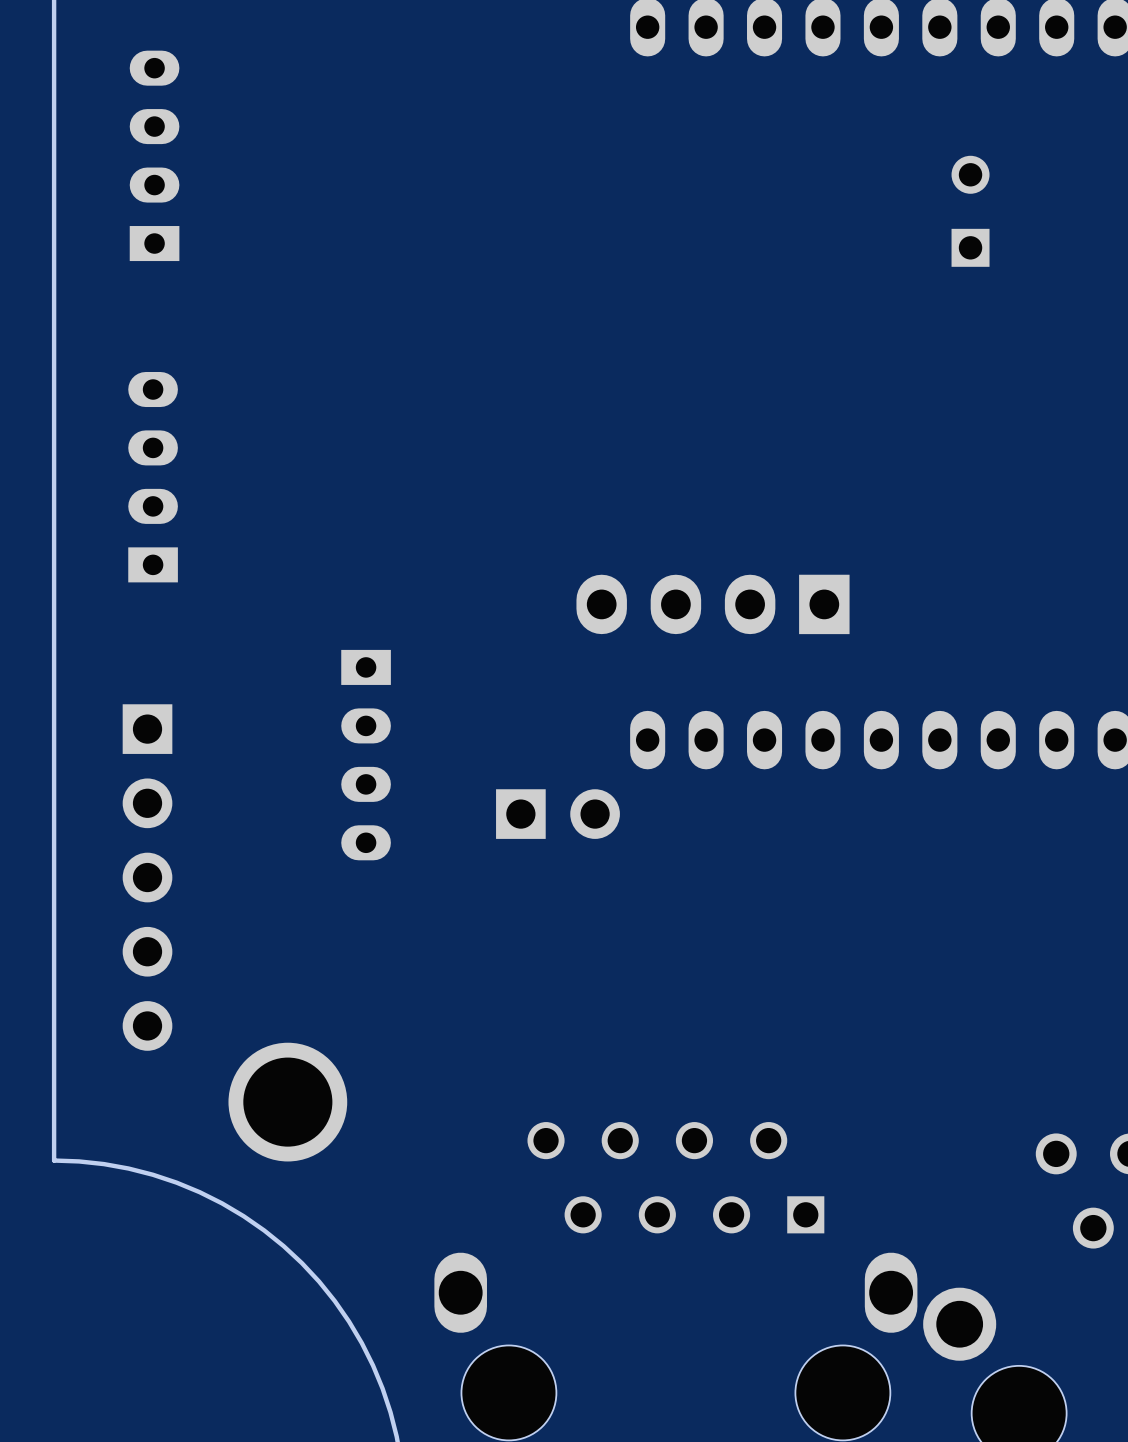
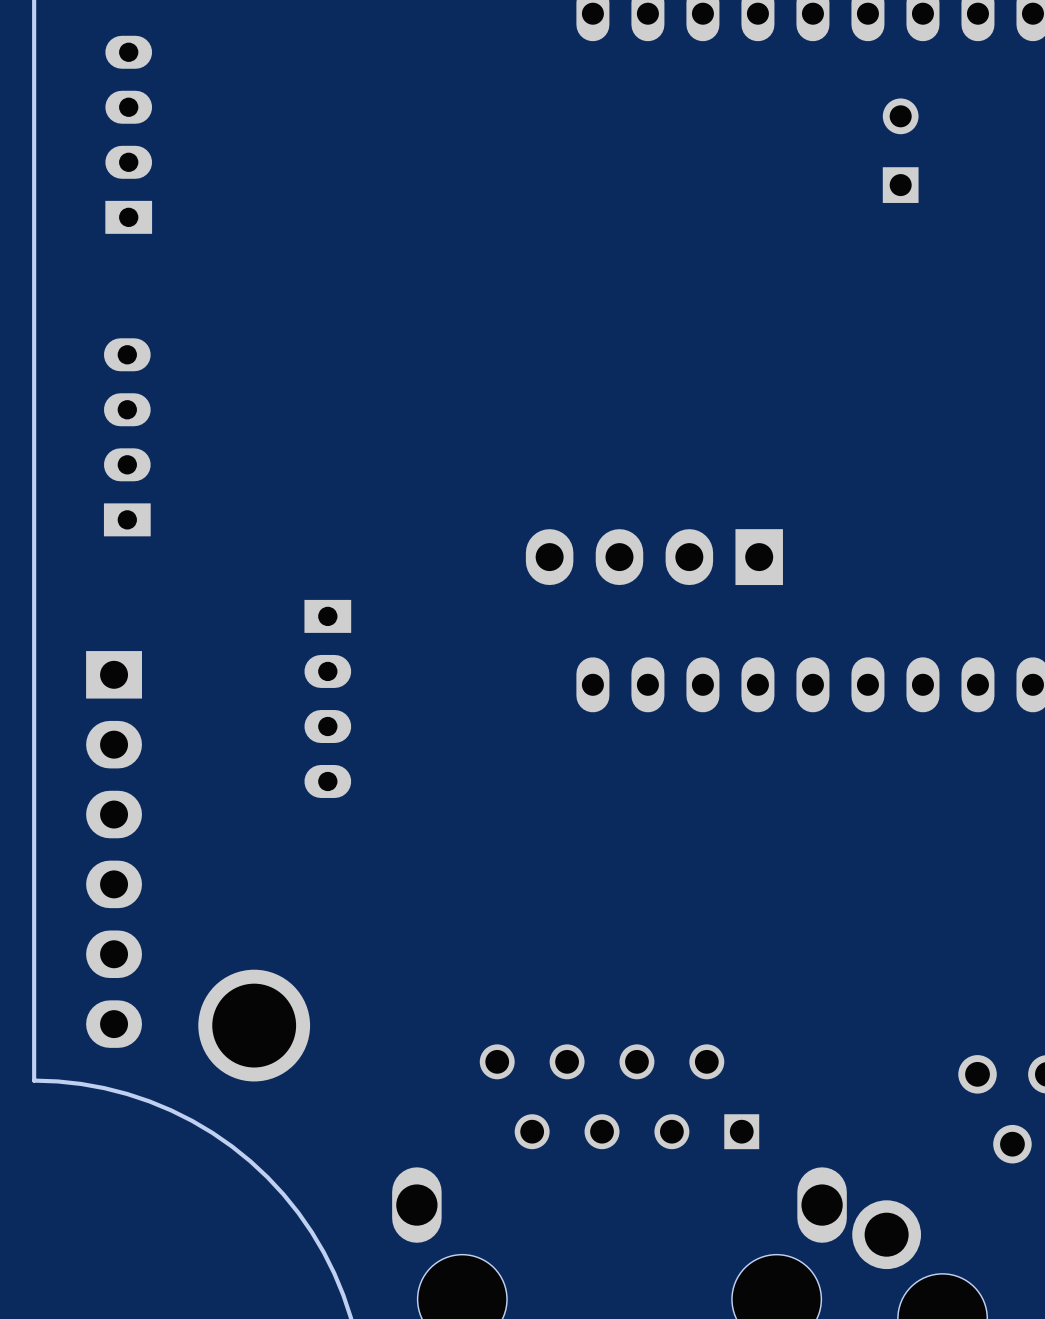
part position: (970, 211) -> (900, 150)
part: (557, 814) -> none
part: (147, 877) -> none
part: none -> (114, 849)

